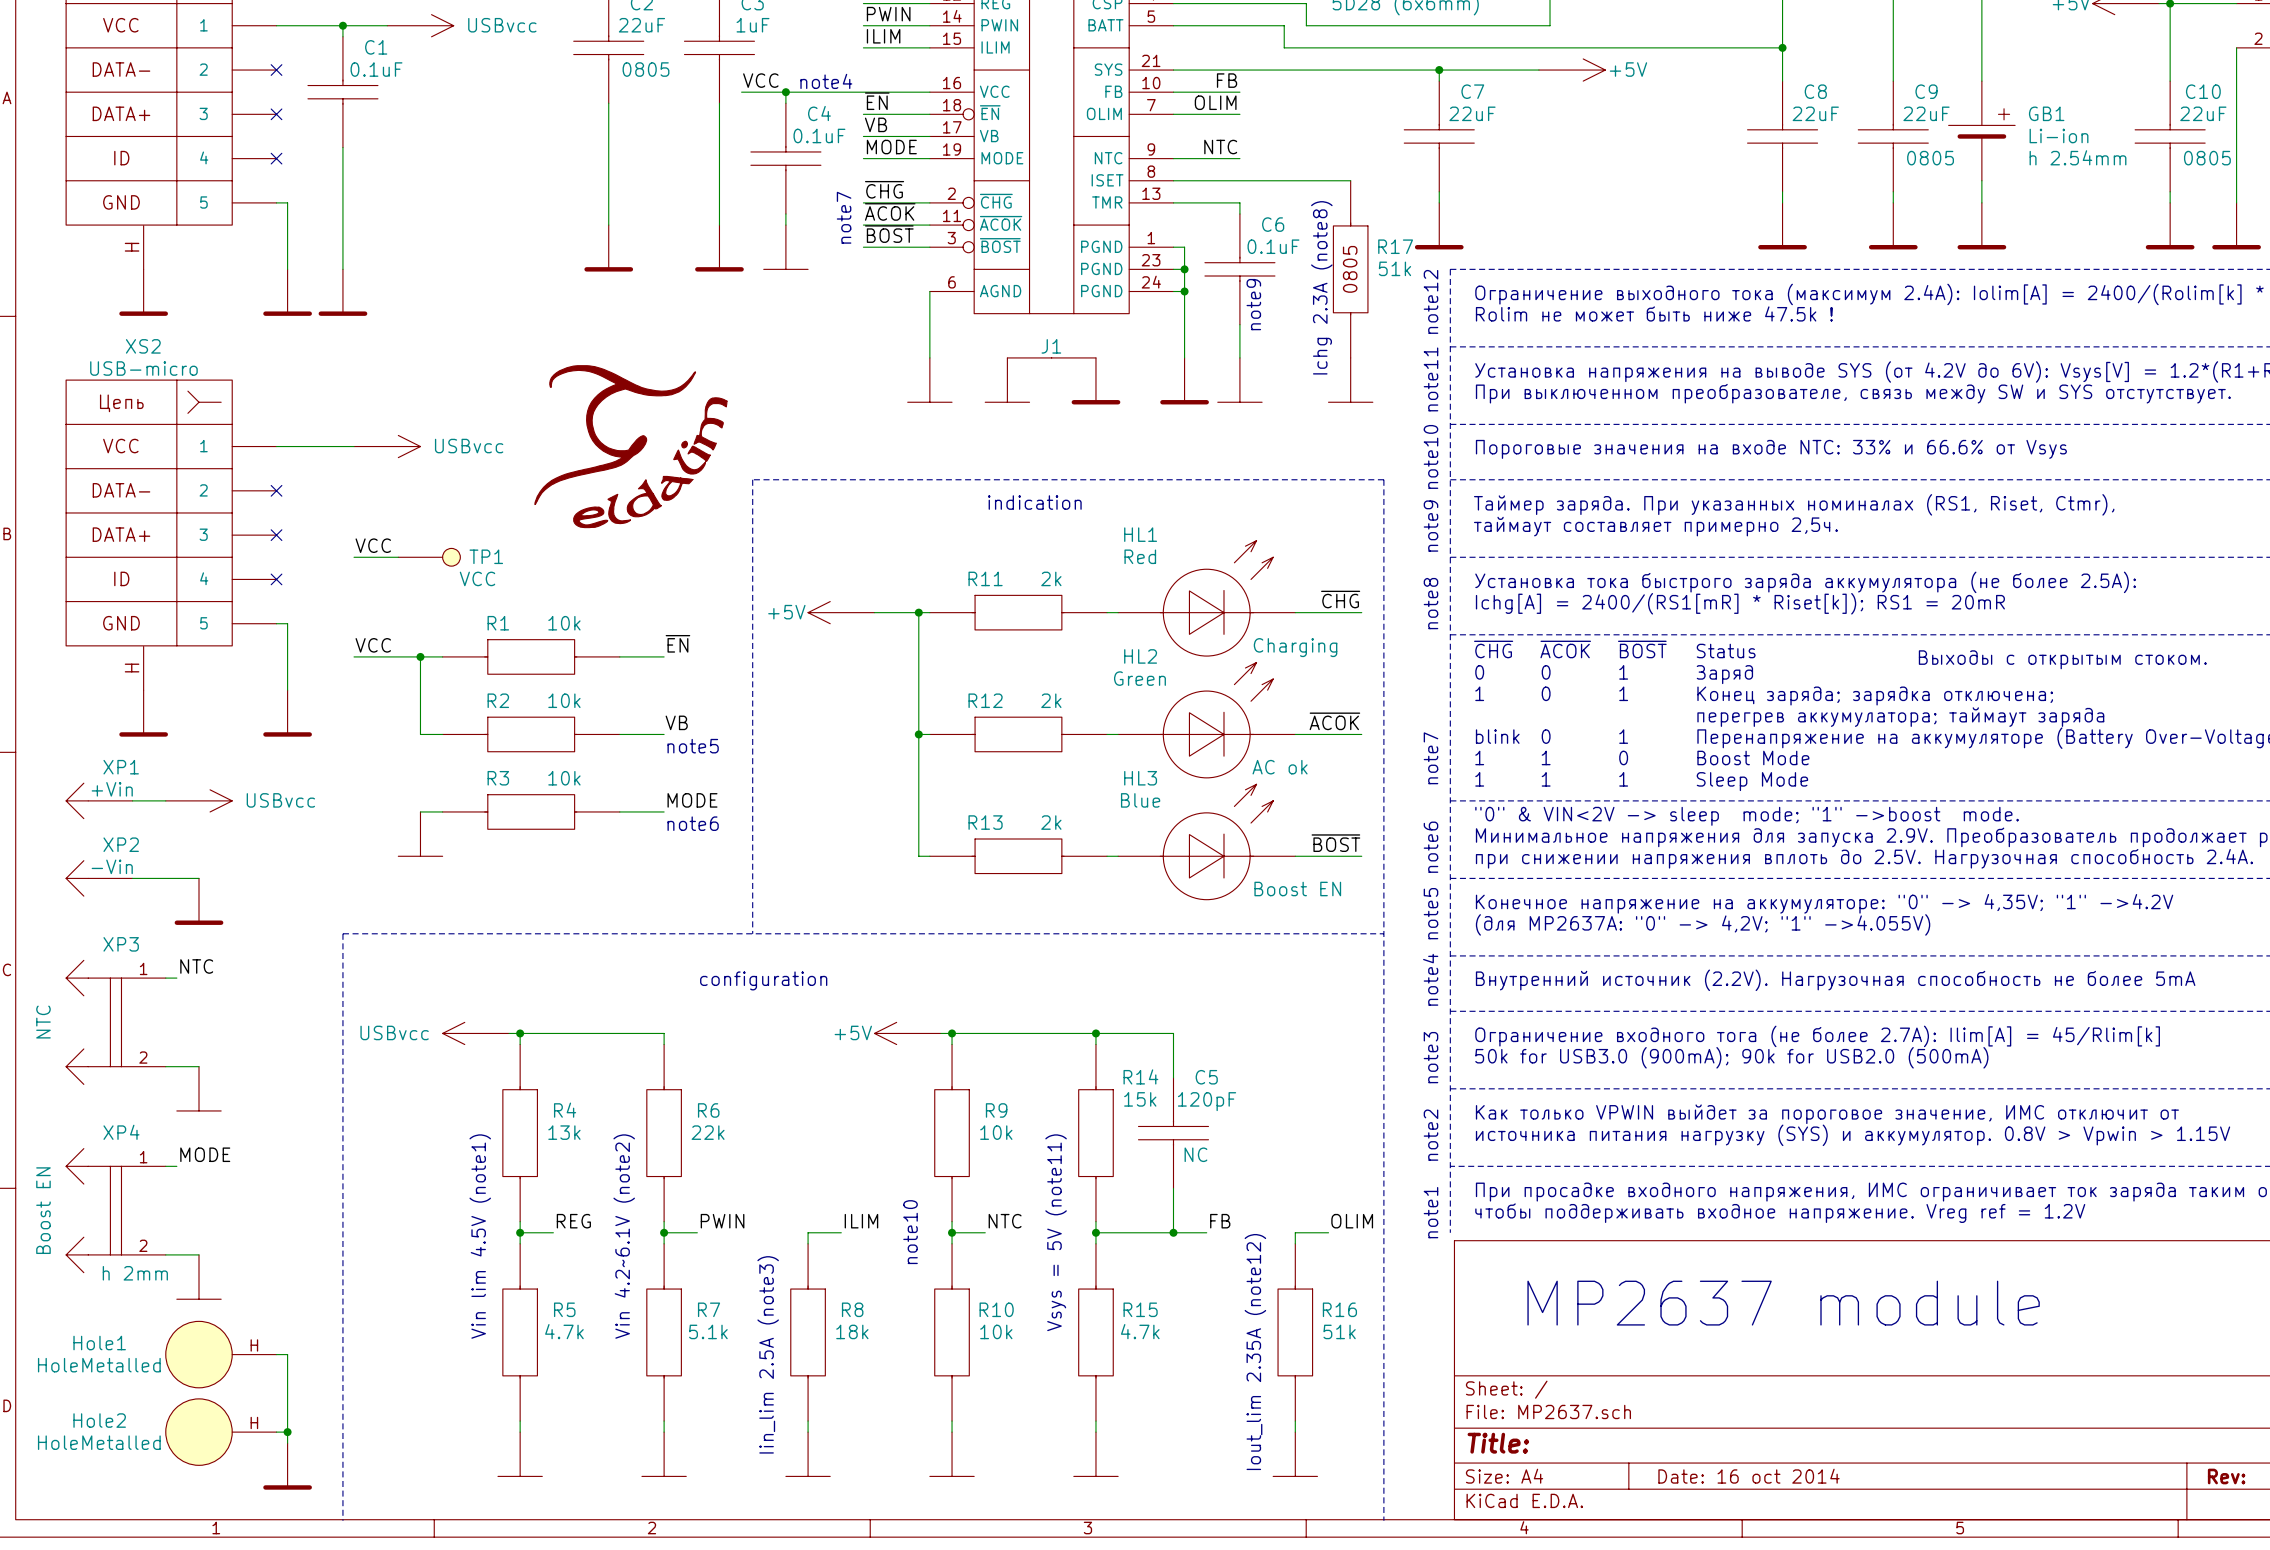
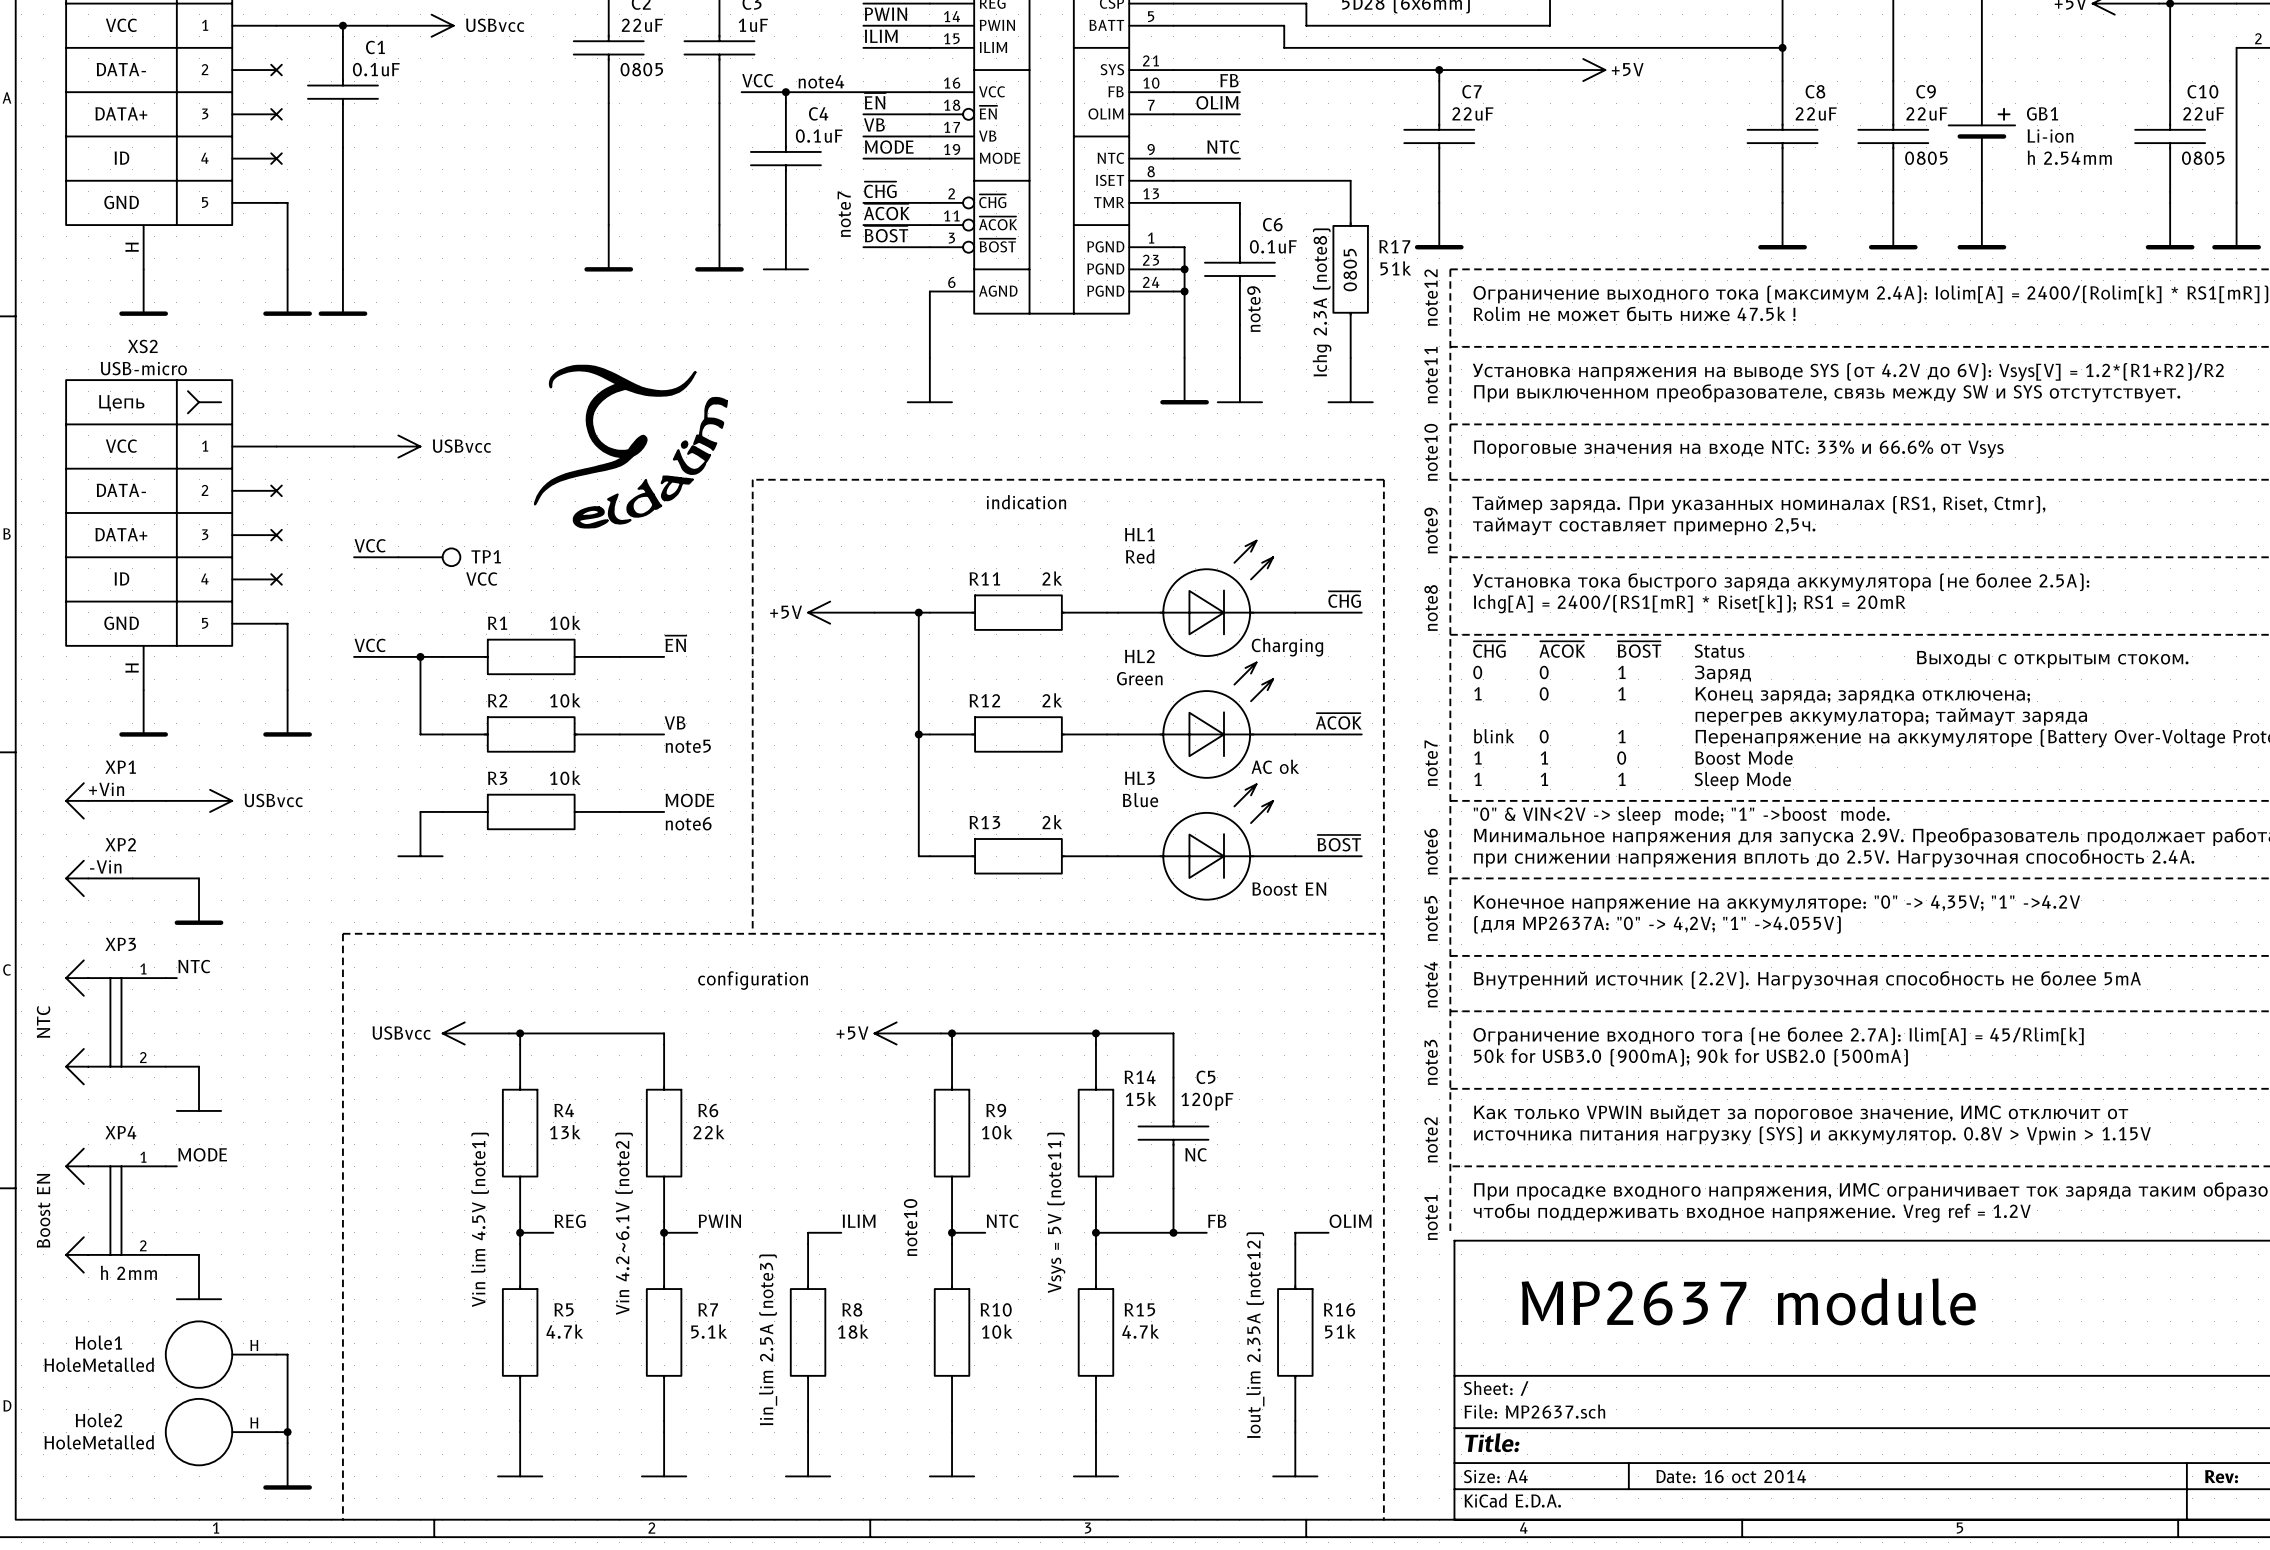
J1: (1051, 357) -> none
power symbol: (1007, 380) -> none
power symbol: (1095, 381) -> none

